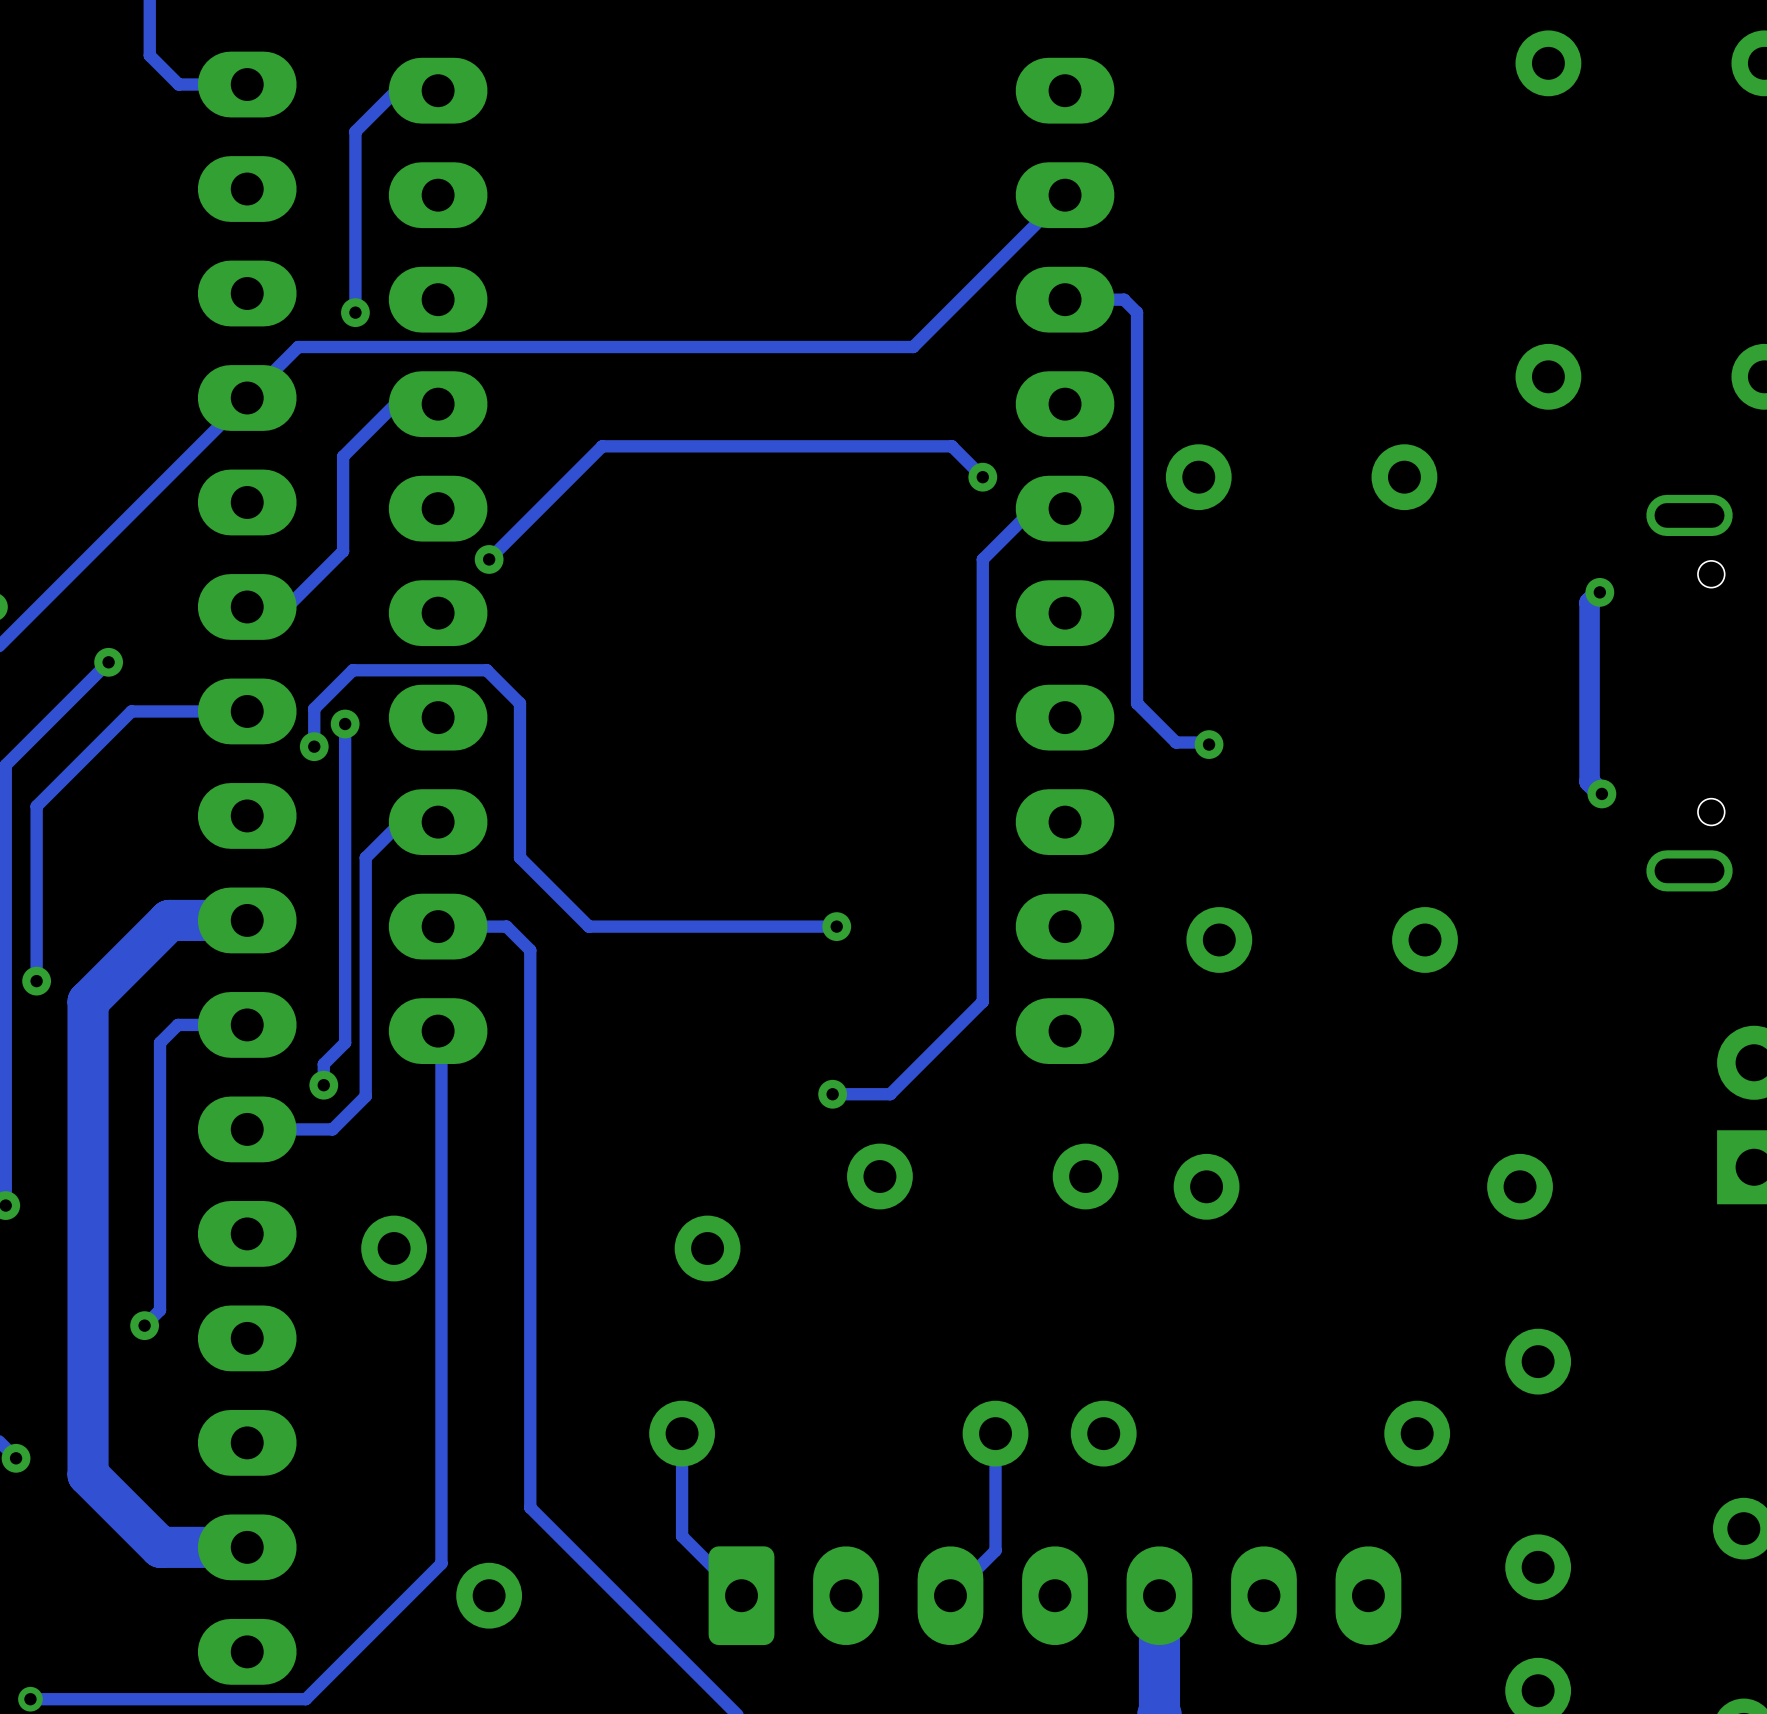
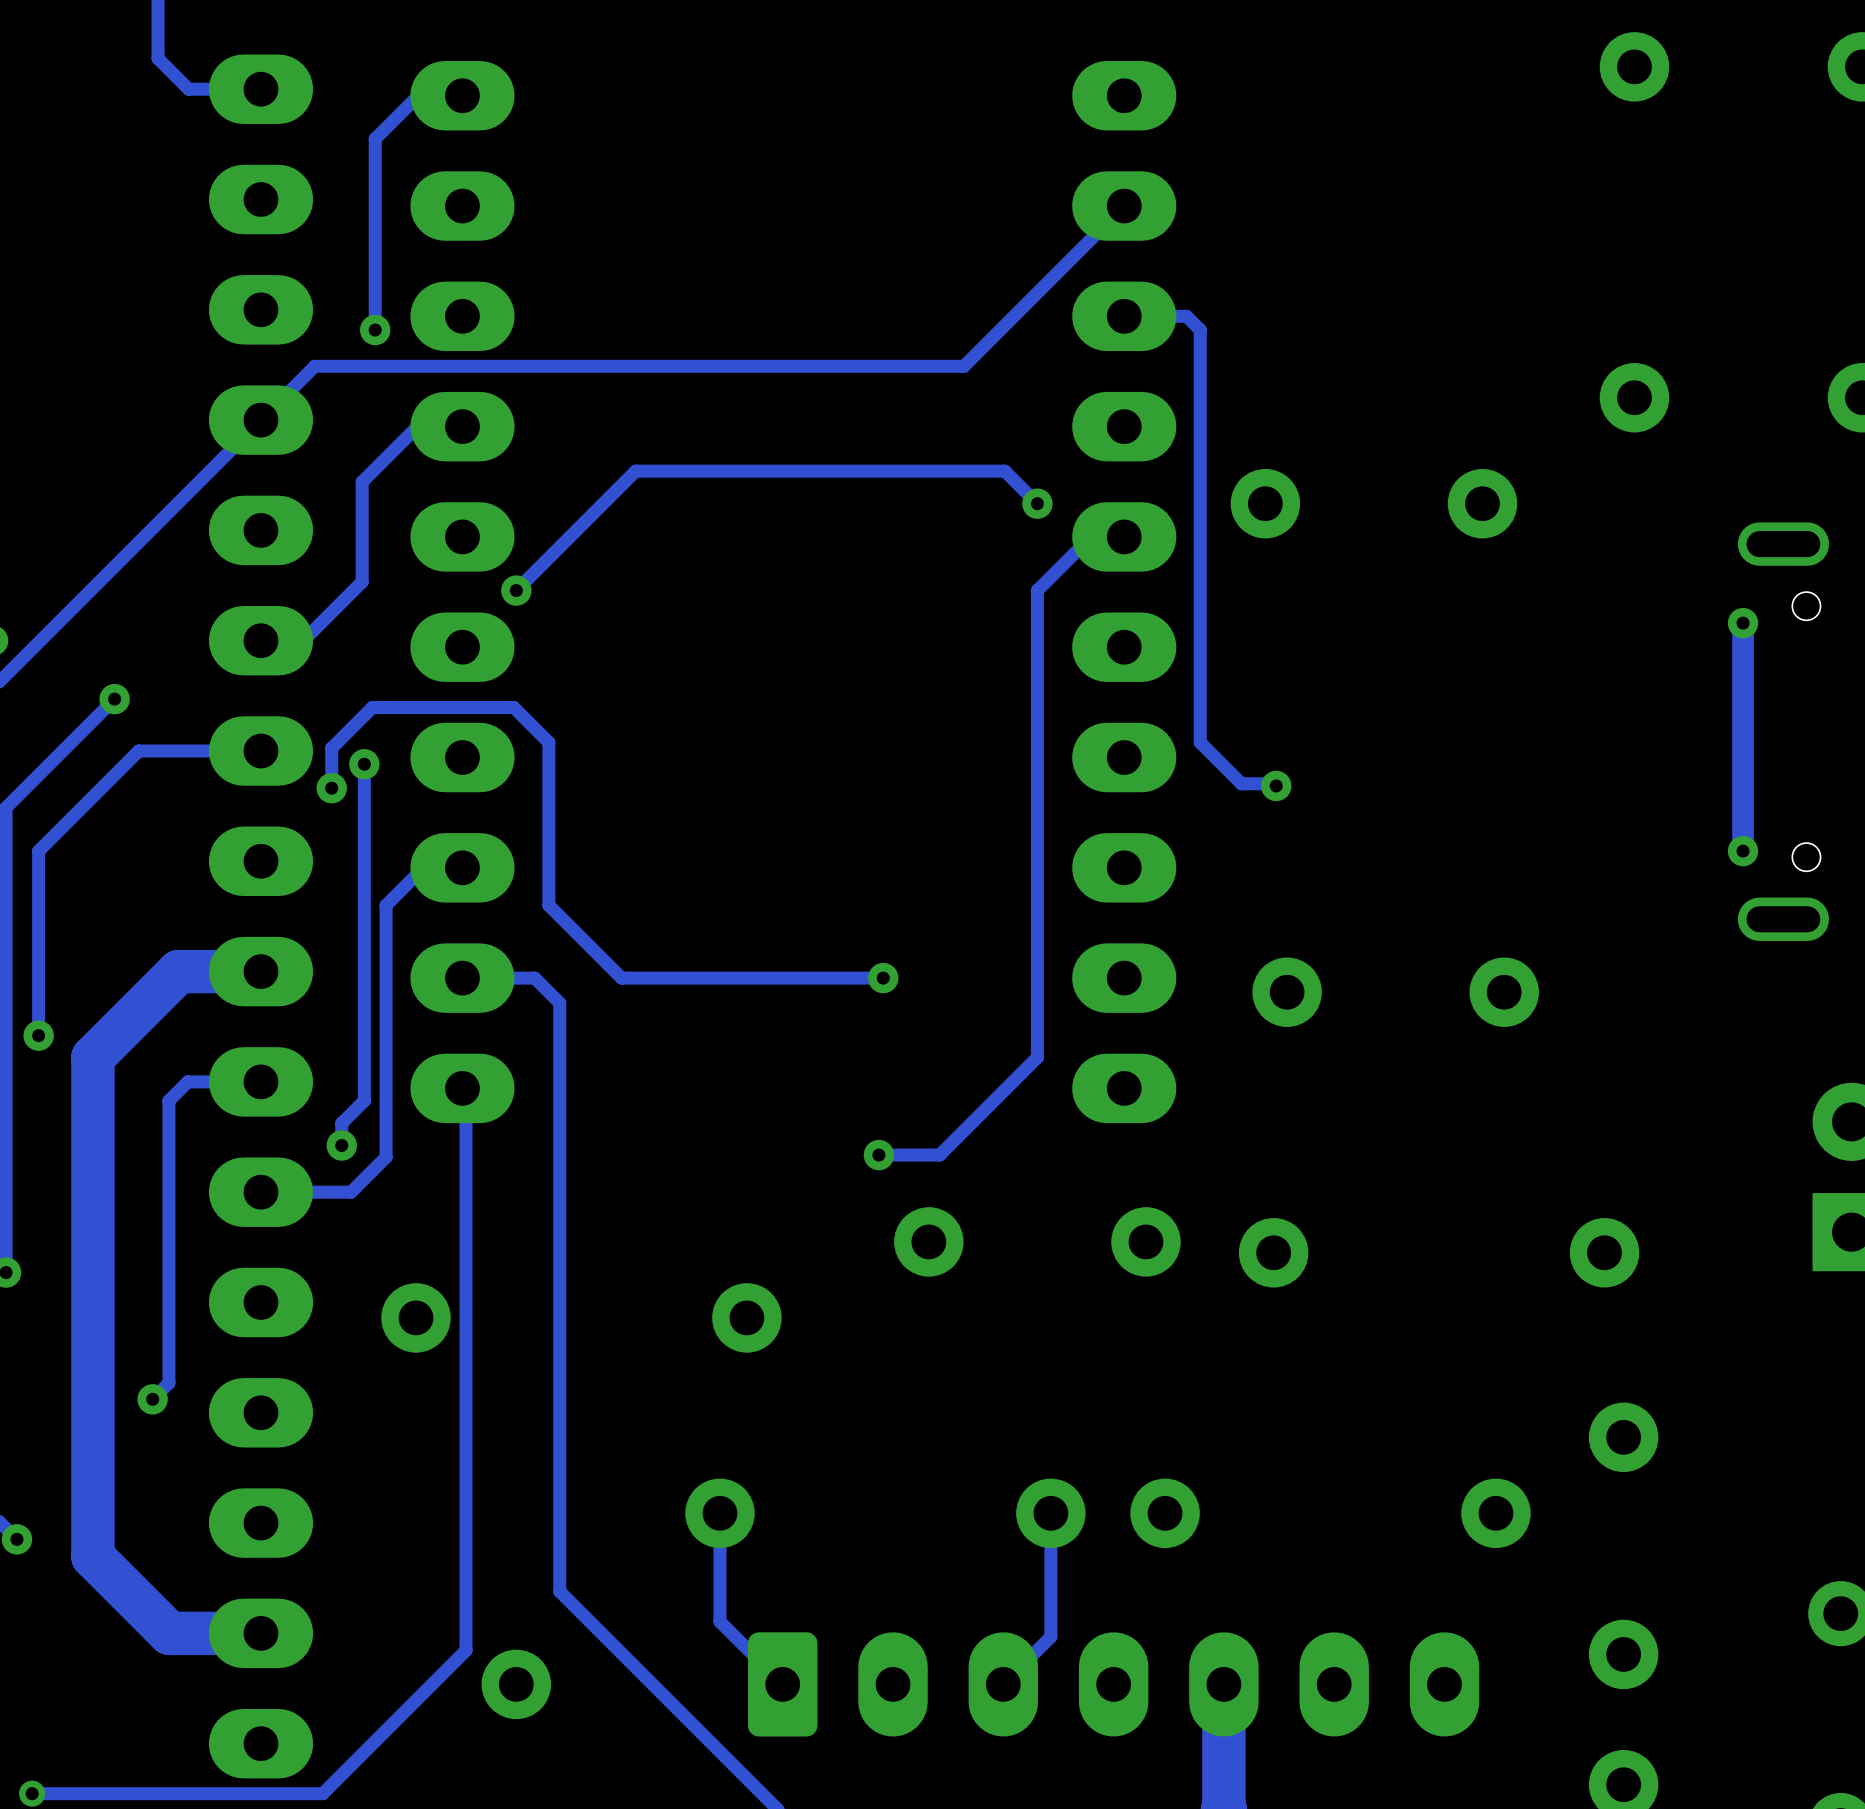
track: none -> (1743, 623) (1743, 851)
track: (1599, 592) (1589, 602) (1589, 781) (1601, 793) -> none
via position: (1599, 592) -> (1743, 623)
via position: (1601, 793) -> (1743, 851)

